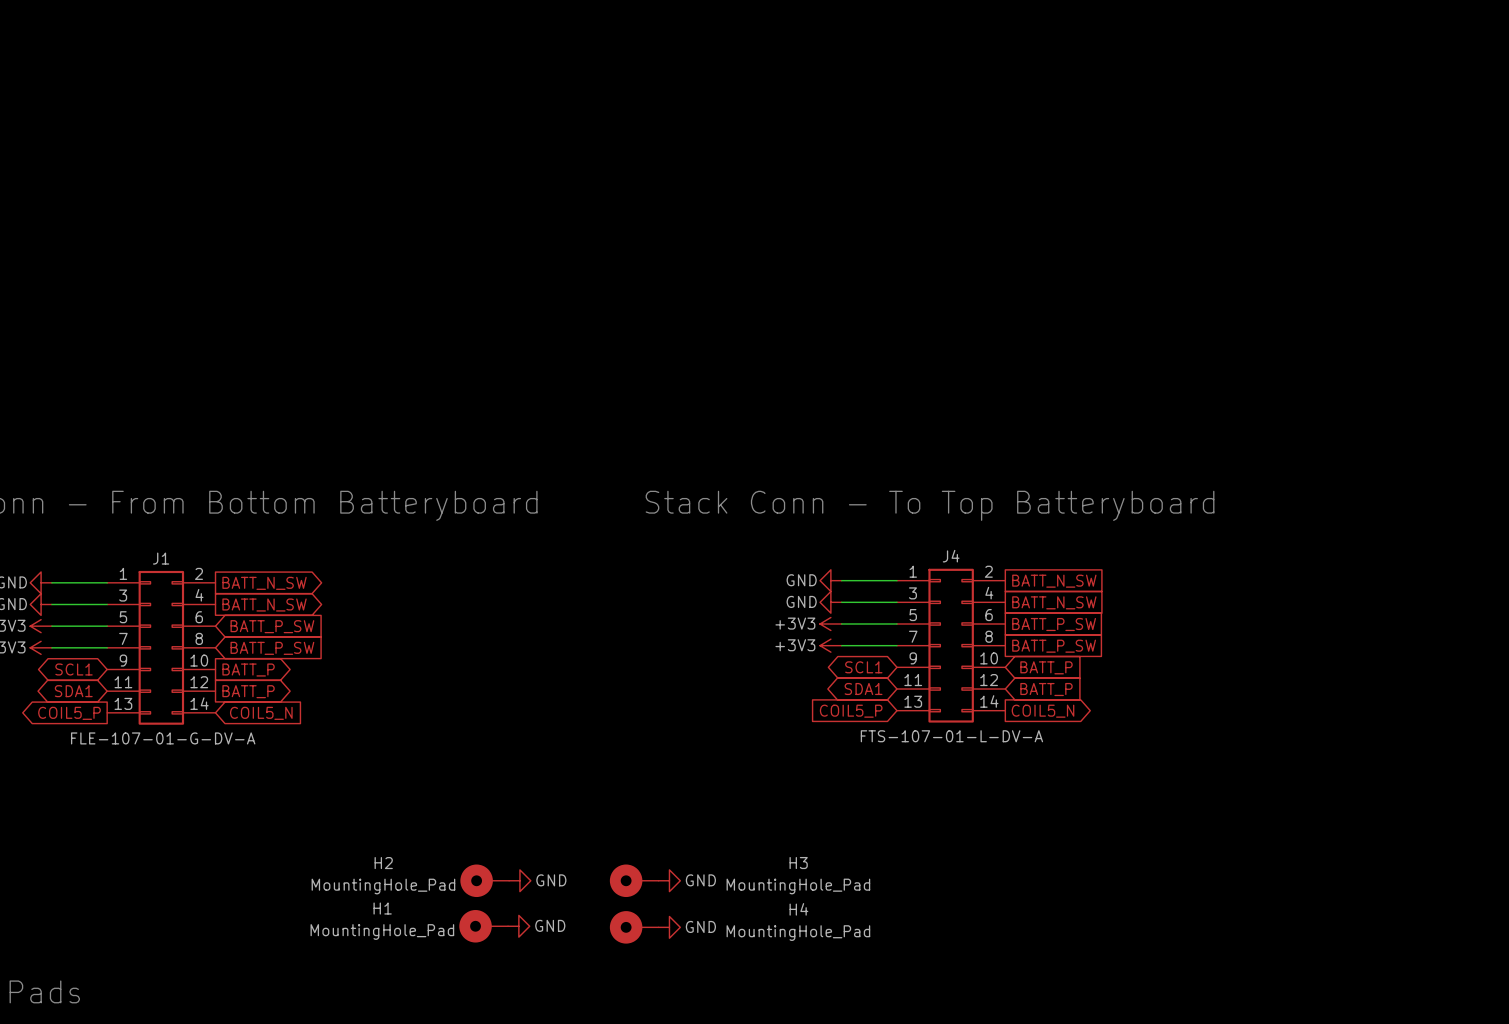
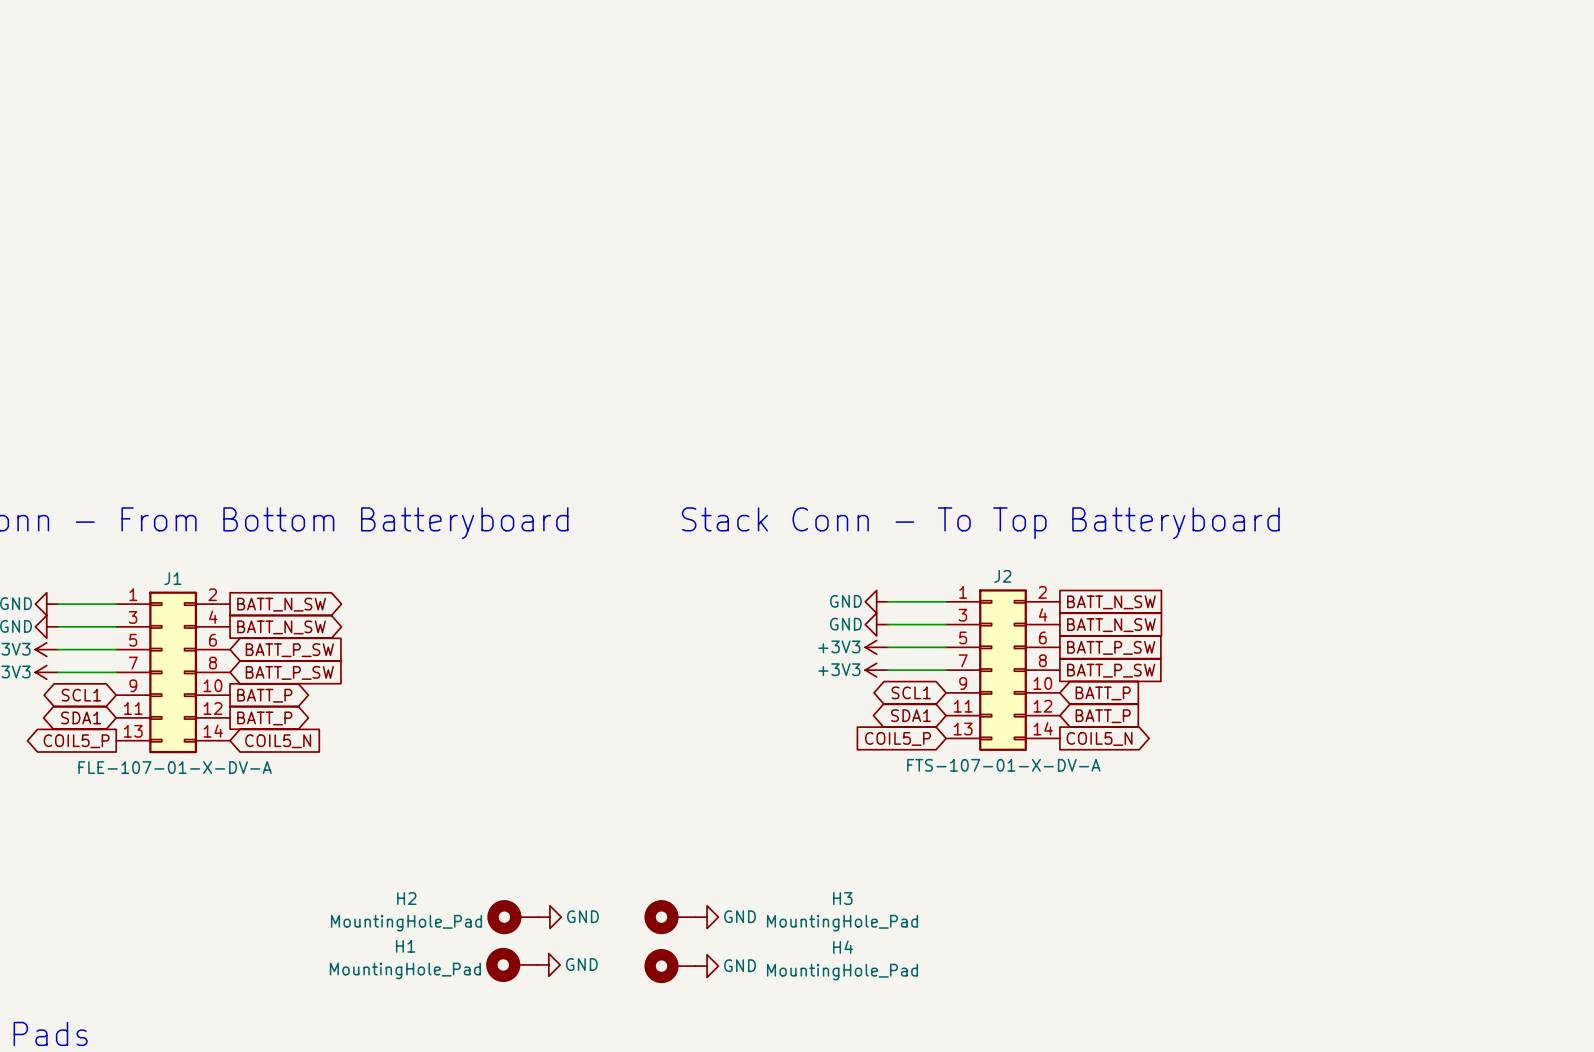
J4 name: J4 (951, 556) -> J2 (1002, 576)
J4 value: FTS-107-01-L-DV-A (951, 736) -> FTS-107-01-X-DV-A (1003, 765)
J1 value: FLE-107-01-G-DV-A (163, 738) -> FLE-107-01-X-DV-A (175, 767)

